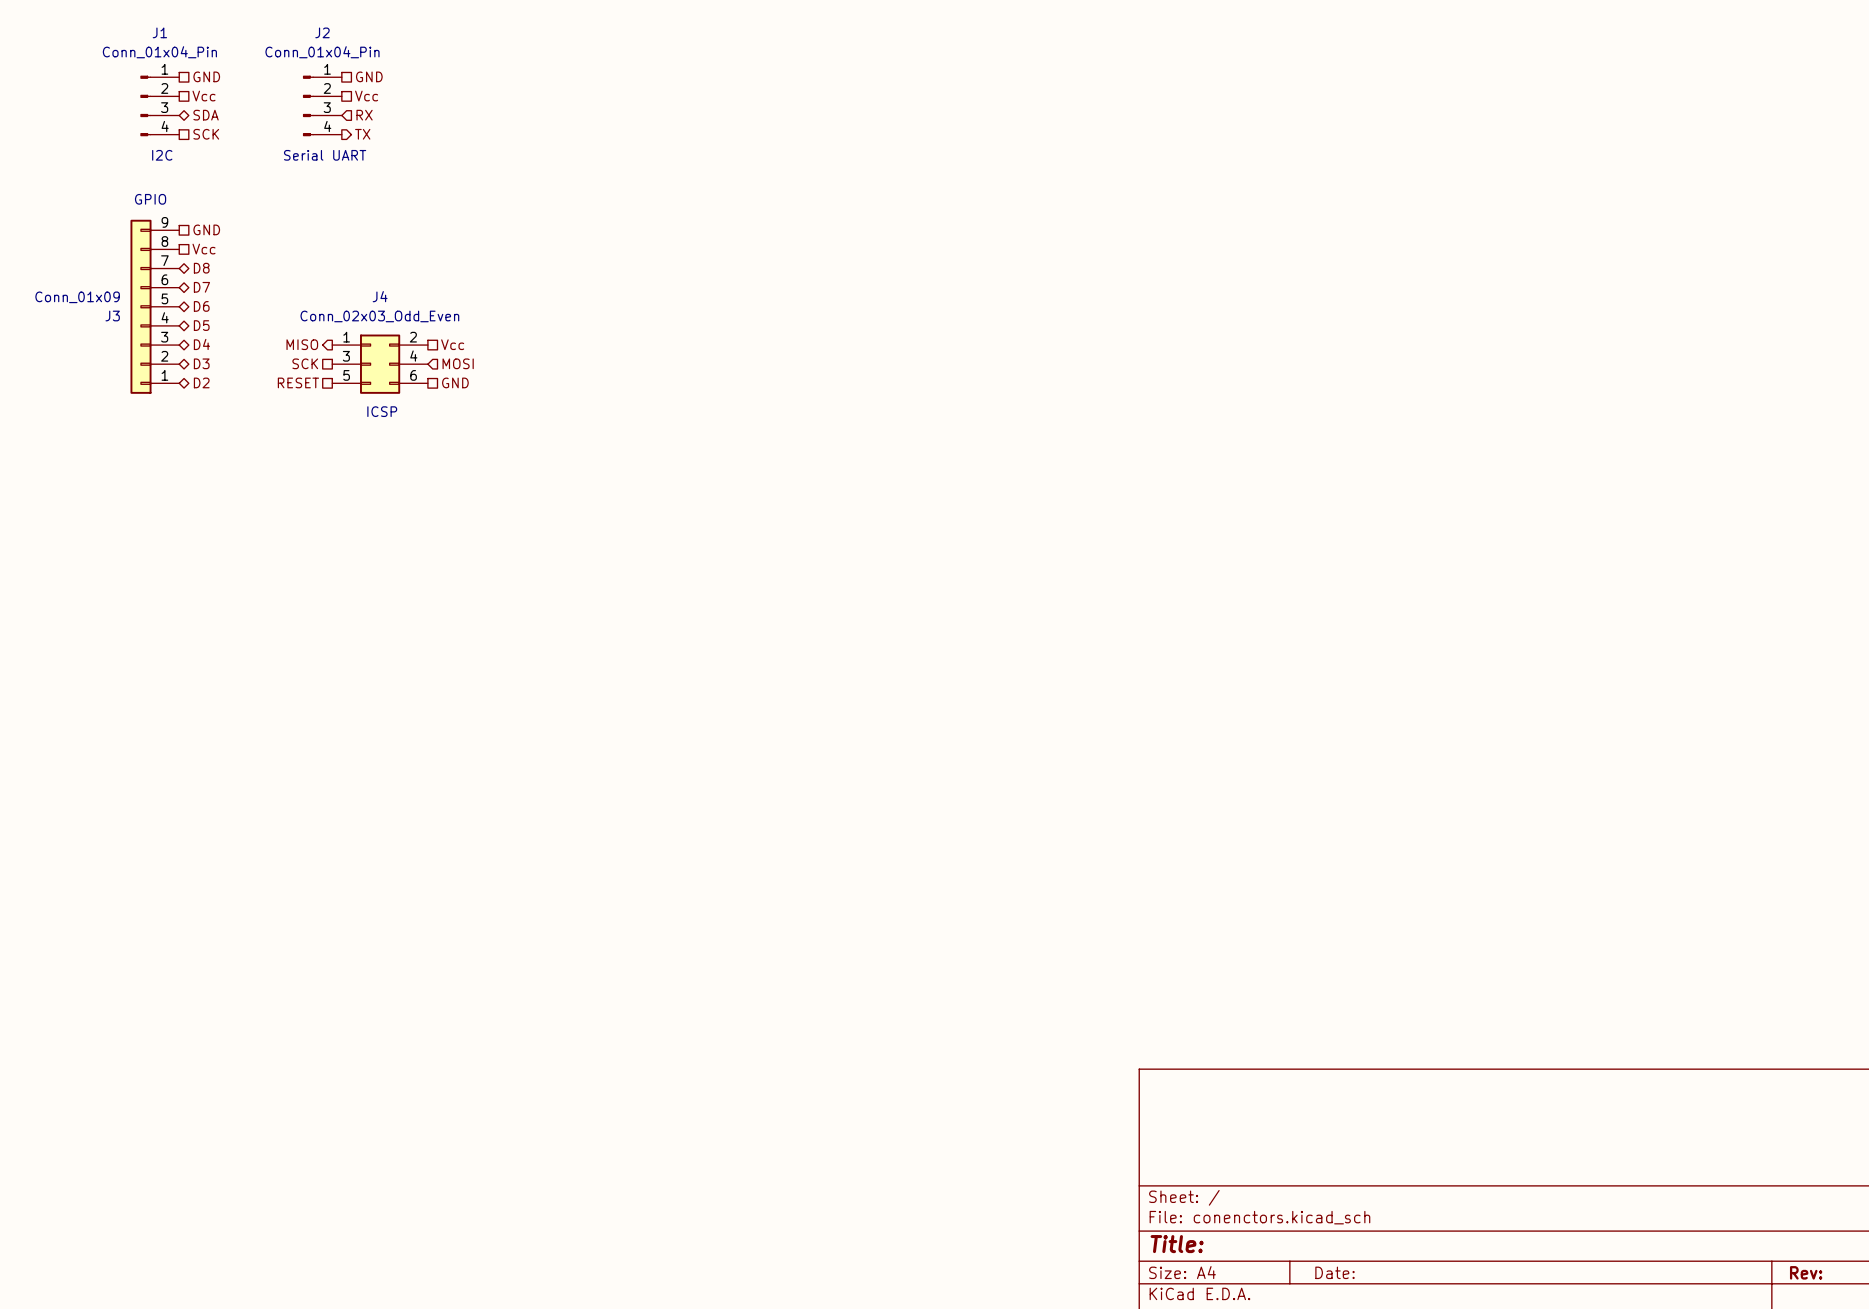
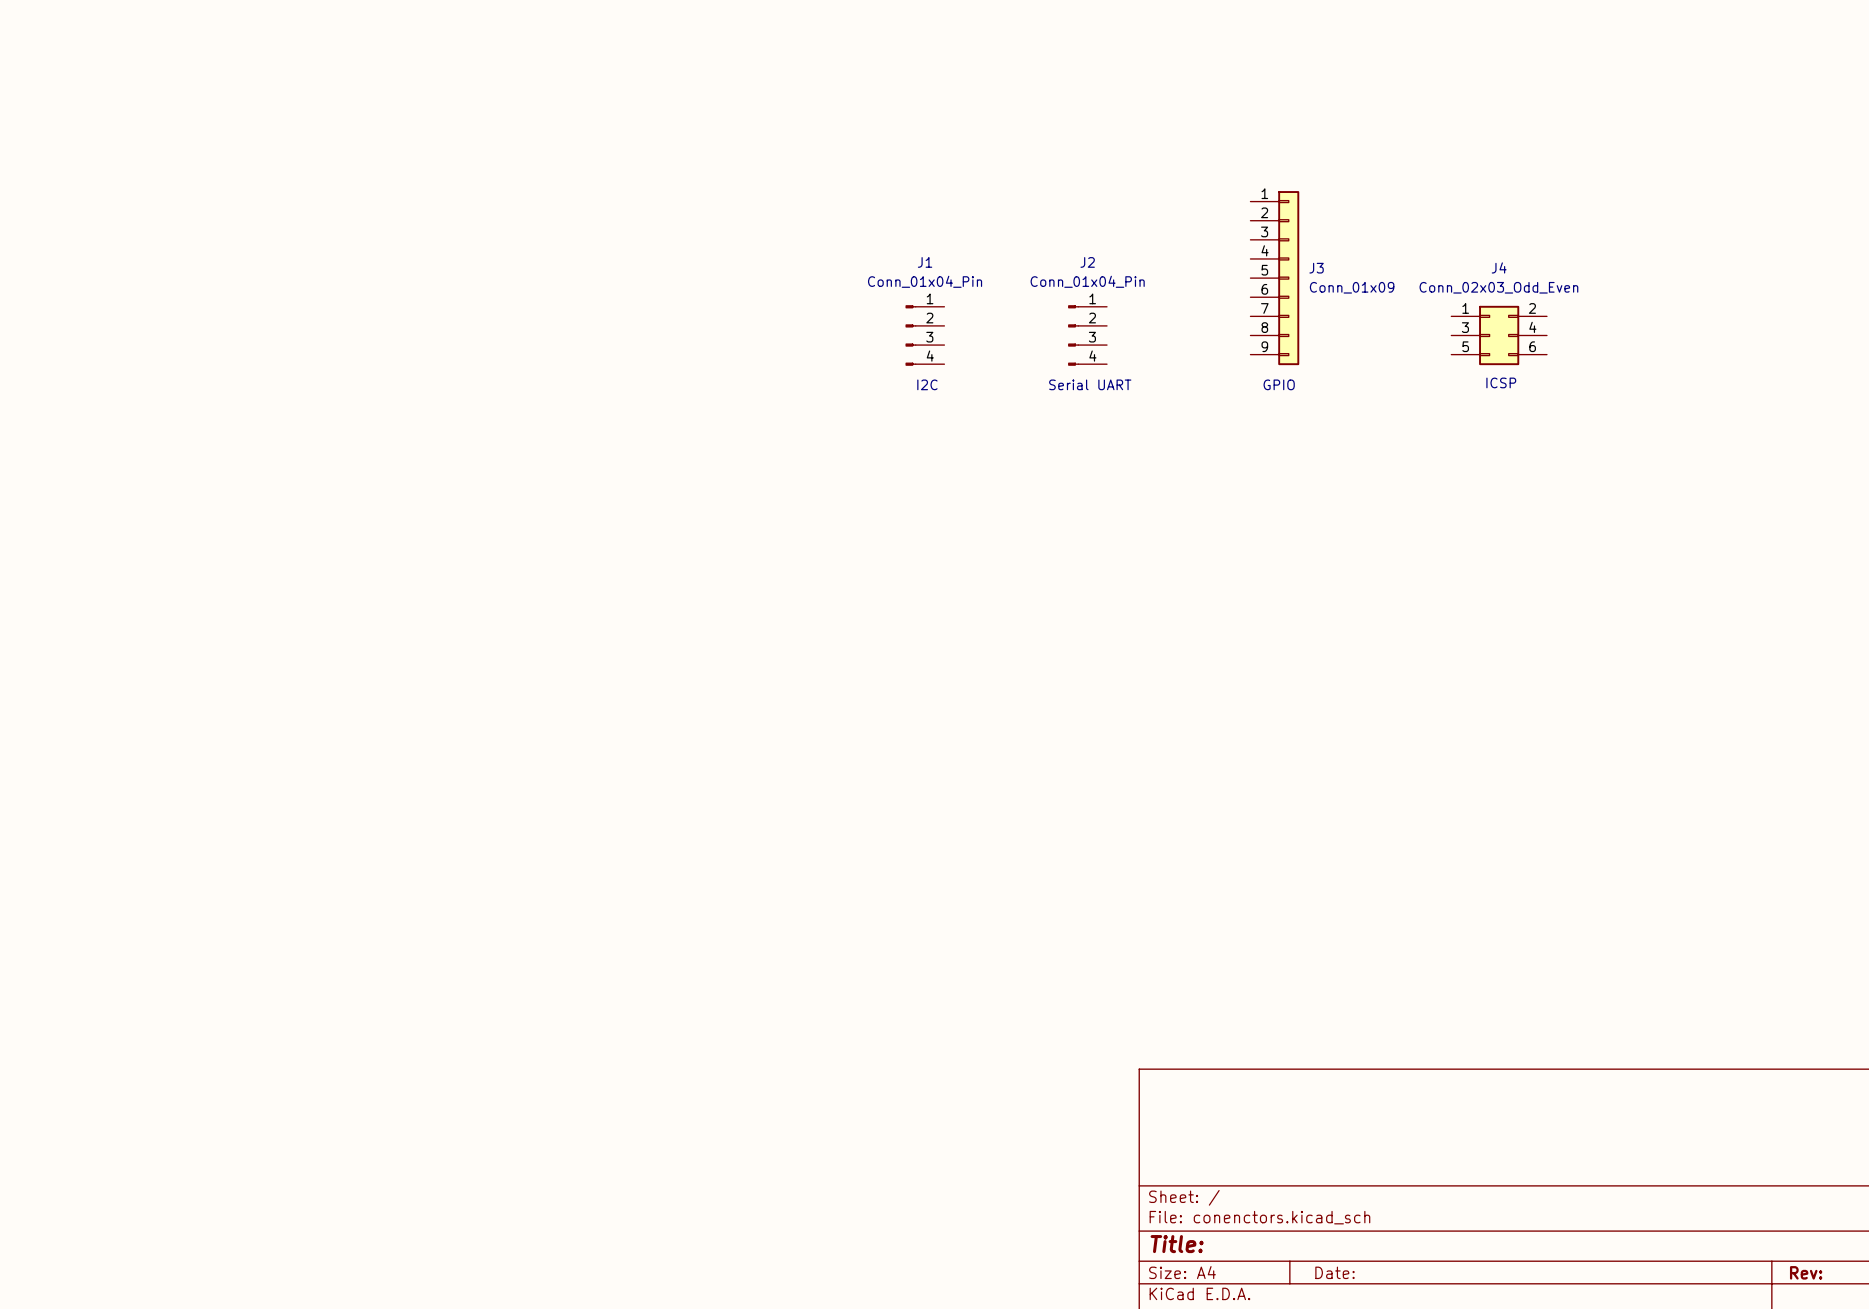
hierarchical label: GND (206, 76) -> none
hierarchical label: GND (369, 76) -> none
hierarchical label: Vcc (203, 96) -> none
hierarchical label: Vcc (366, 96) -> none
J1 position: (159, 105) -> (924, 335)
J2 position: (322, 105) -> (1087, 335)
hierarchical label: SDA (206, 115) -> none
hierarchical label: RX (364, 115) -> none
hierarchical label: SCK (206, 134) -> none
hierarchical label: TX (362, 134) -> none
hierarchical label: GND (206, 229) -> none
hierarchical label: Vcc (203, 249) -> none
hierarchical label: D8 (201, 268) -> none
hierarchical label: D7 (201, 287) -> none
J3 rotation: 0° (140, 306) -> 180° (1288, 278)
J3 position: (154, 306) -> (1274, 278)
hierarchical label: D6 (201, 306) -> none
hierarchical label: D5 (201, 325) -> none
hierarchical label: D4 (201, 344) -> none
hierarchical label: MISO (302, 344) -> none
hierarchical label: Vcc (452, 344) -> none
hierarchical label: D3 (201, 363) -> none
hierarchical label: SCK (305, 363) -> none
hierarchical label: MOSI (458, 363) -> none
J4 position: (380, 364) -> (1499, 335)
hierarchical label: D2 (201, 382) -> none
hierarchical label: RESET (298, 382) -> none
hierarchical label: GND (455, 382) -> none

